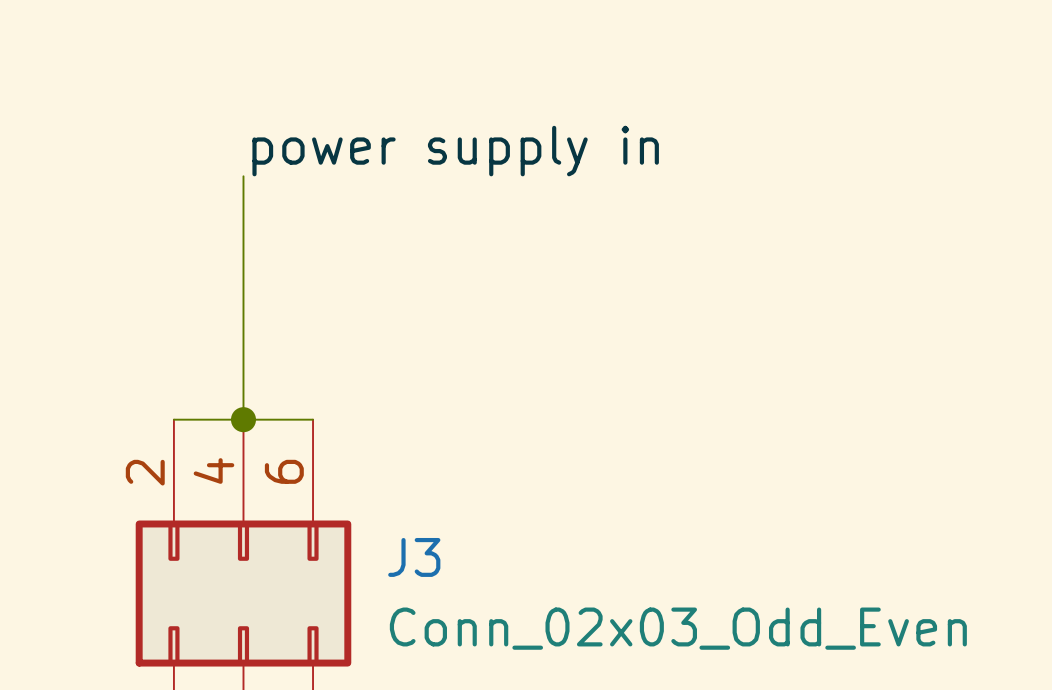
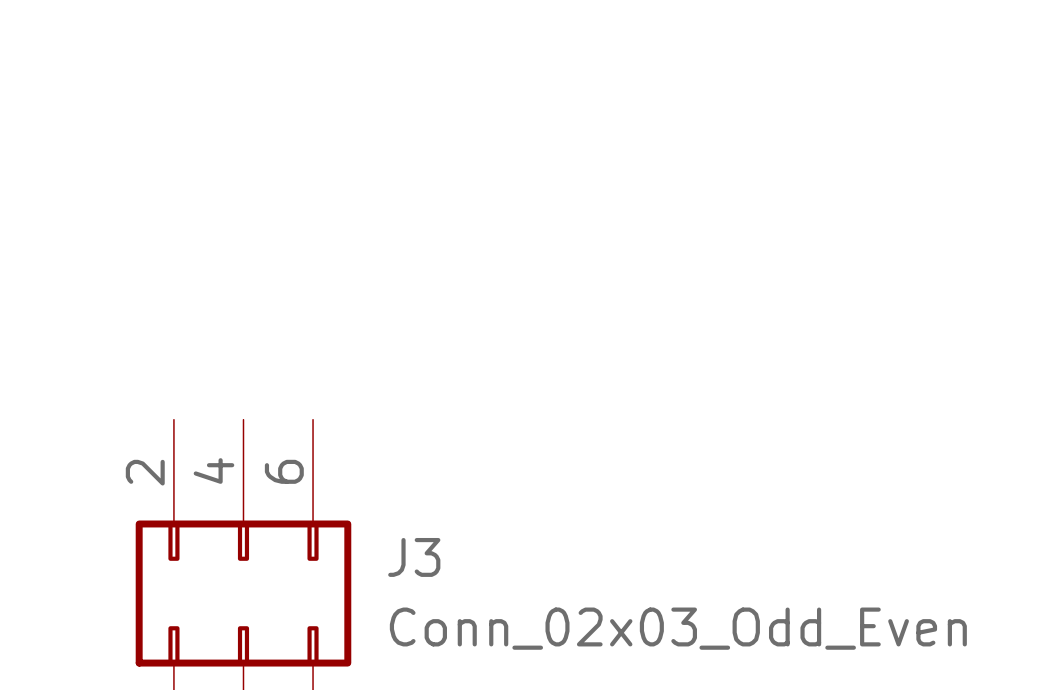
label: power supply in (455, 151) -> none
wire: (243, 176) (243, 419) -> none
wire: (173, 419) (313, 419) -> none
junction: (243, 419) -> none

